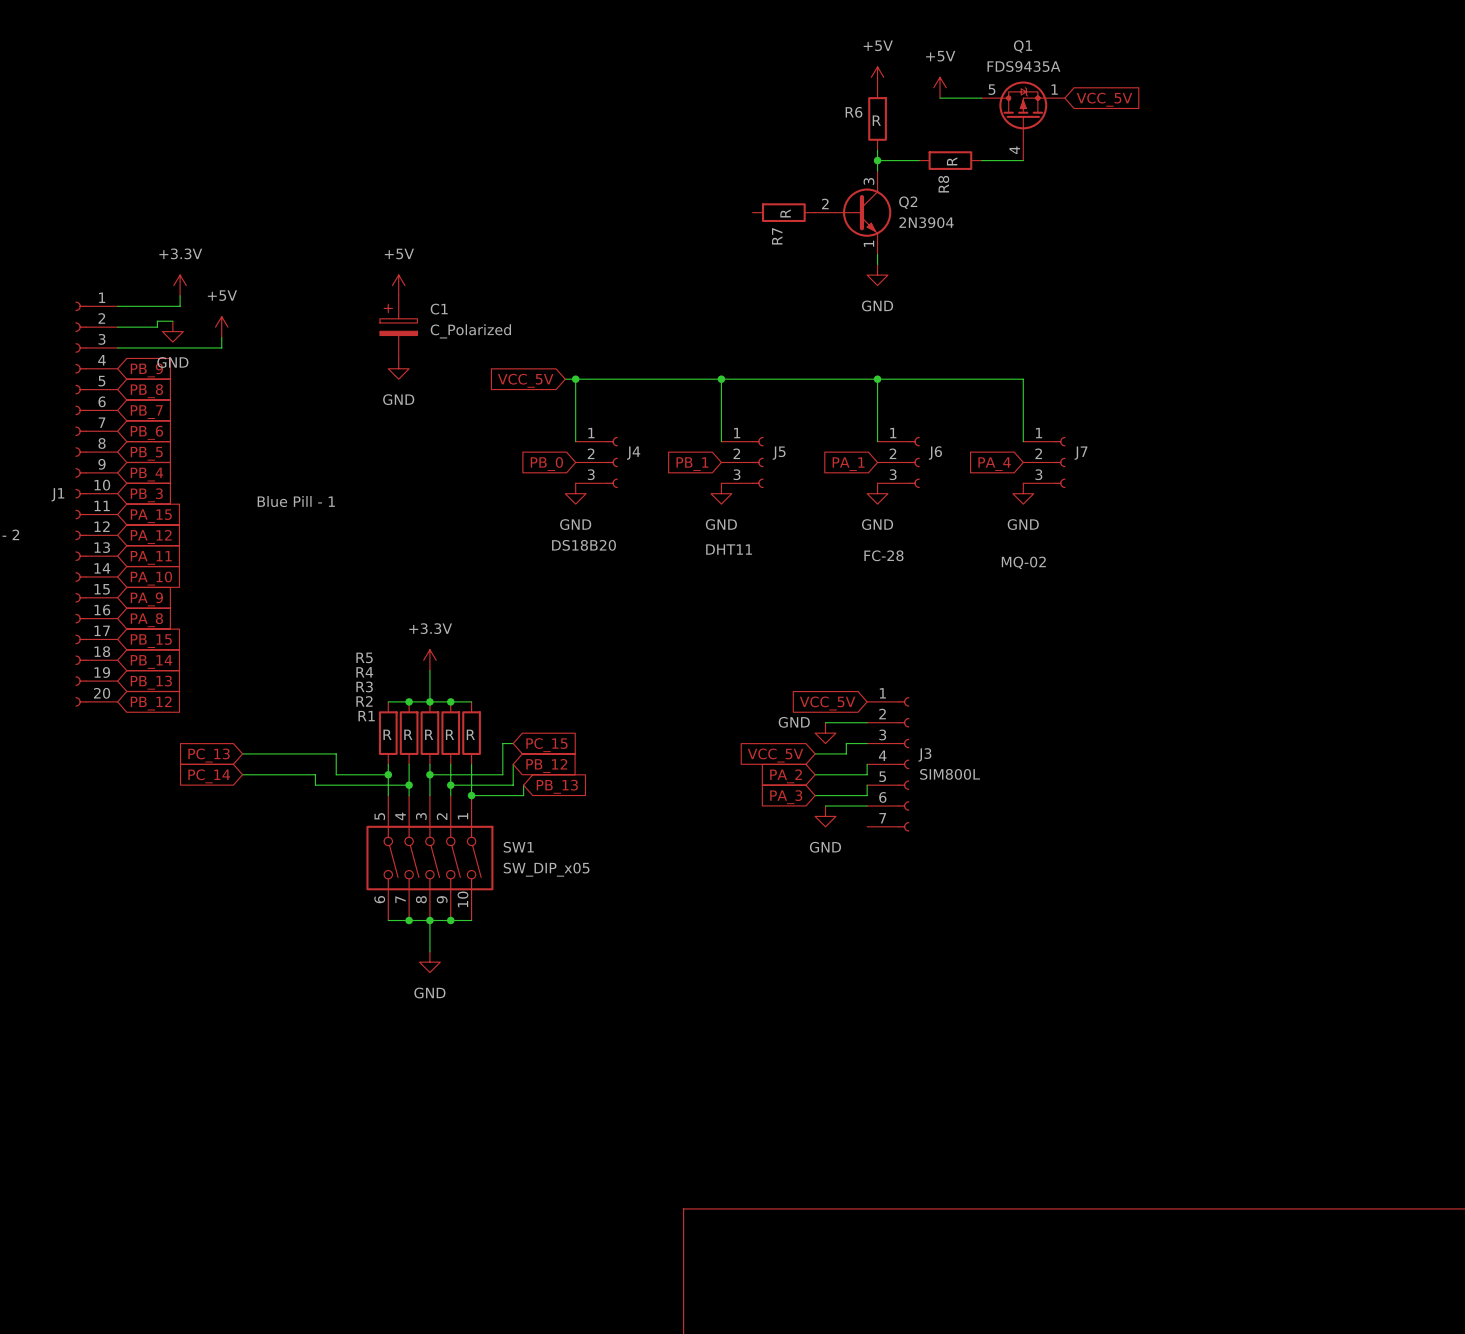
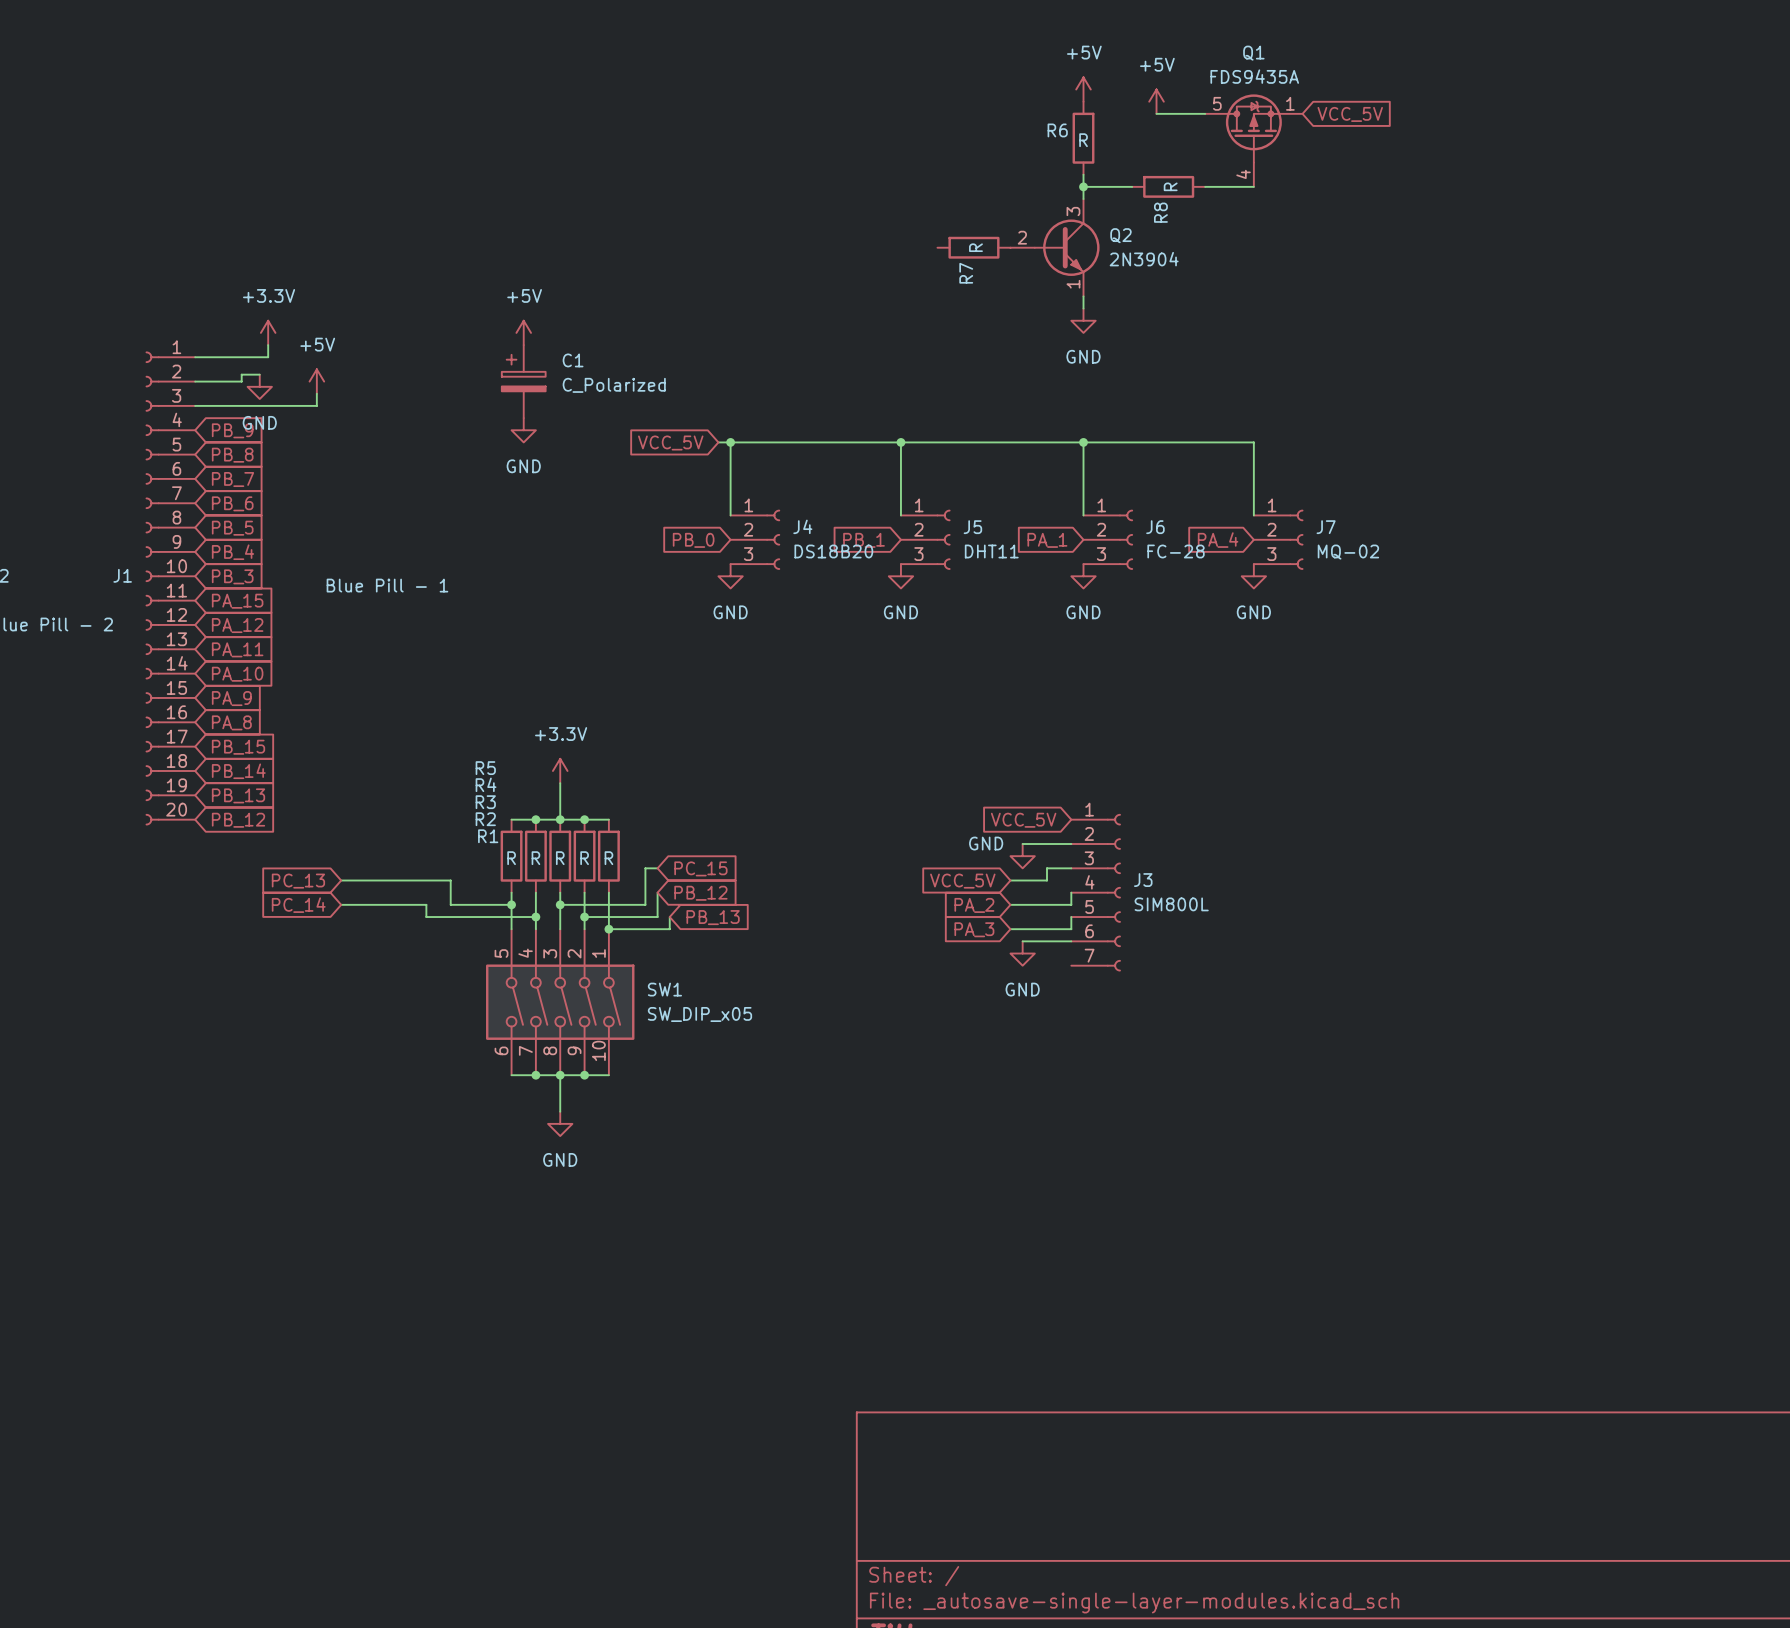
J4 value position: DS18B20 (584, 545) -> DS18B20 (833, 551)
J5 value position: DHT11 (729, 549) -> DHT11 (991, 551)
J6 value position: FC-28 (883, 555) -> FC-28 (1176, 551)
J7 value position: MQ-02 (1023, 562) -> MQ-02 (1348, 552)

